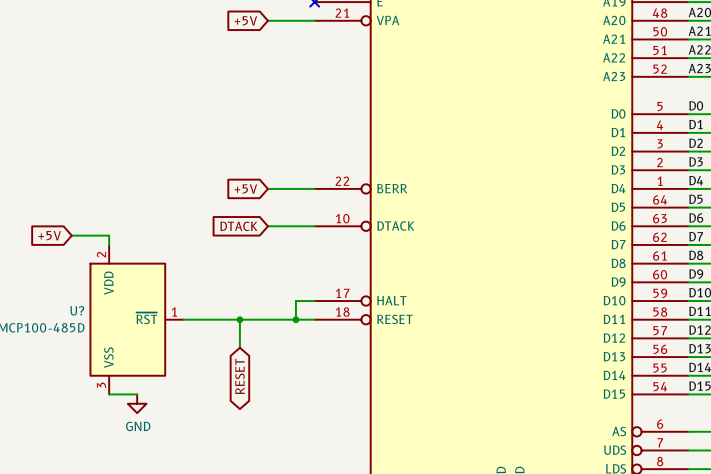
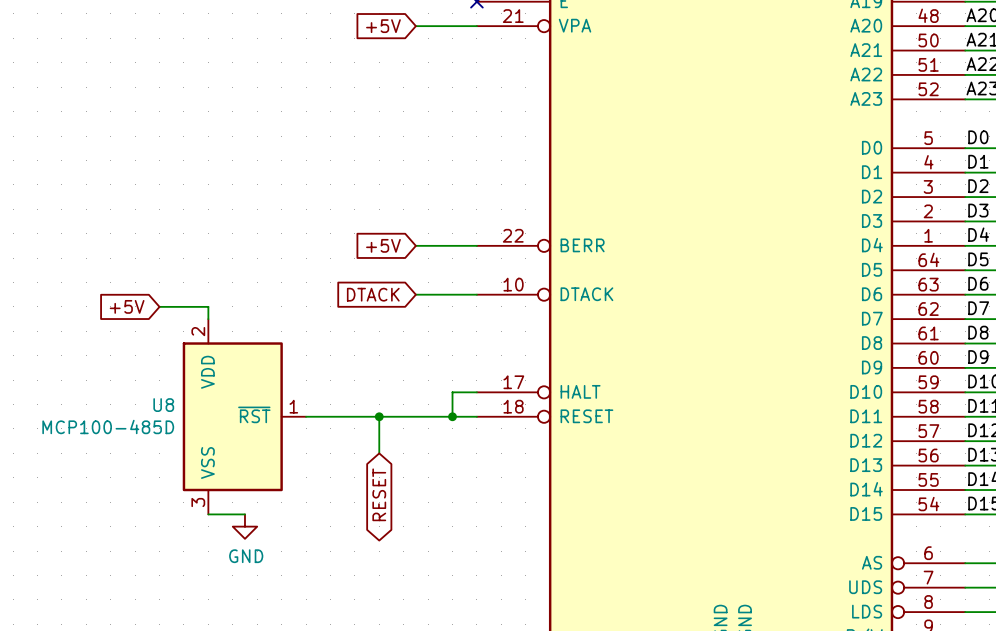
U? name: U? (77, 310) -> U8 (163, 405)

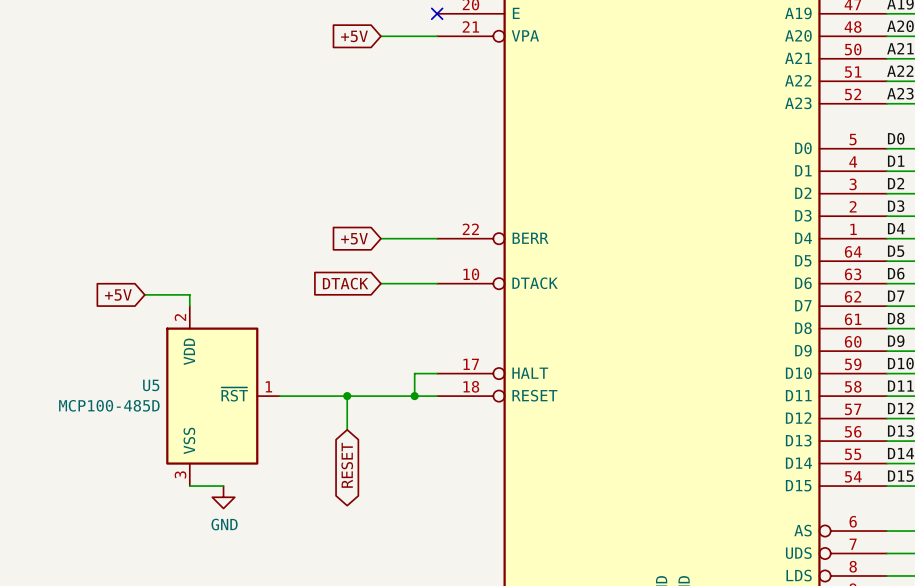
U8 name: U8 (163, 405) -> U5 (151, 385)

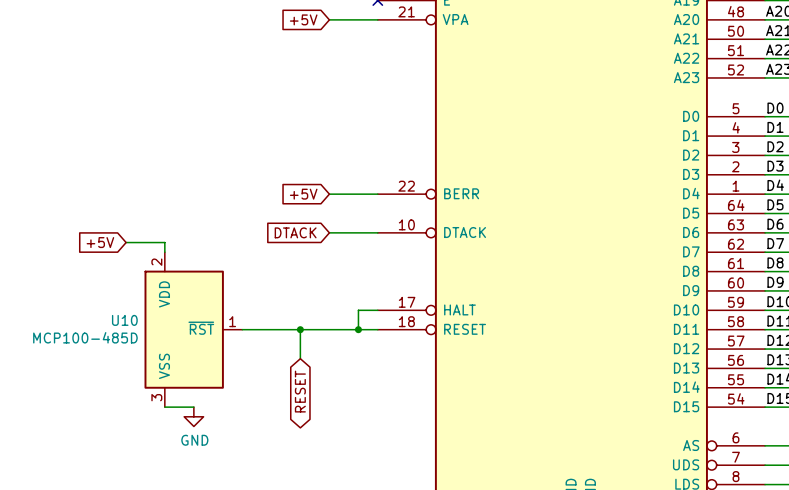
U5 name: U5 (151, 385) -> U10 (124, 320)

